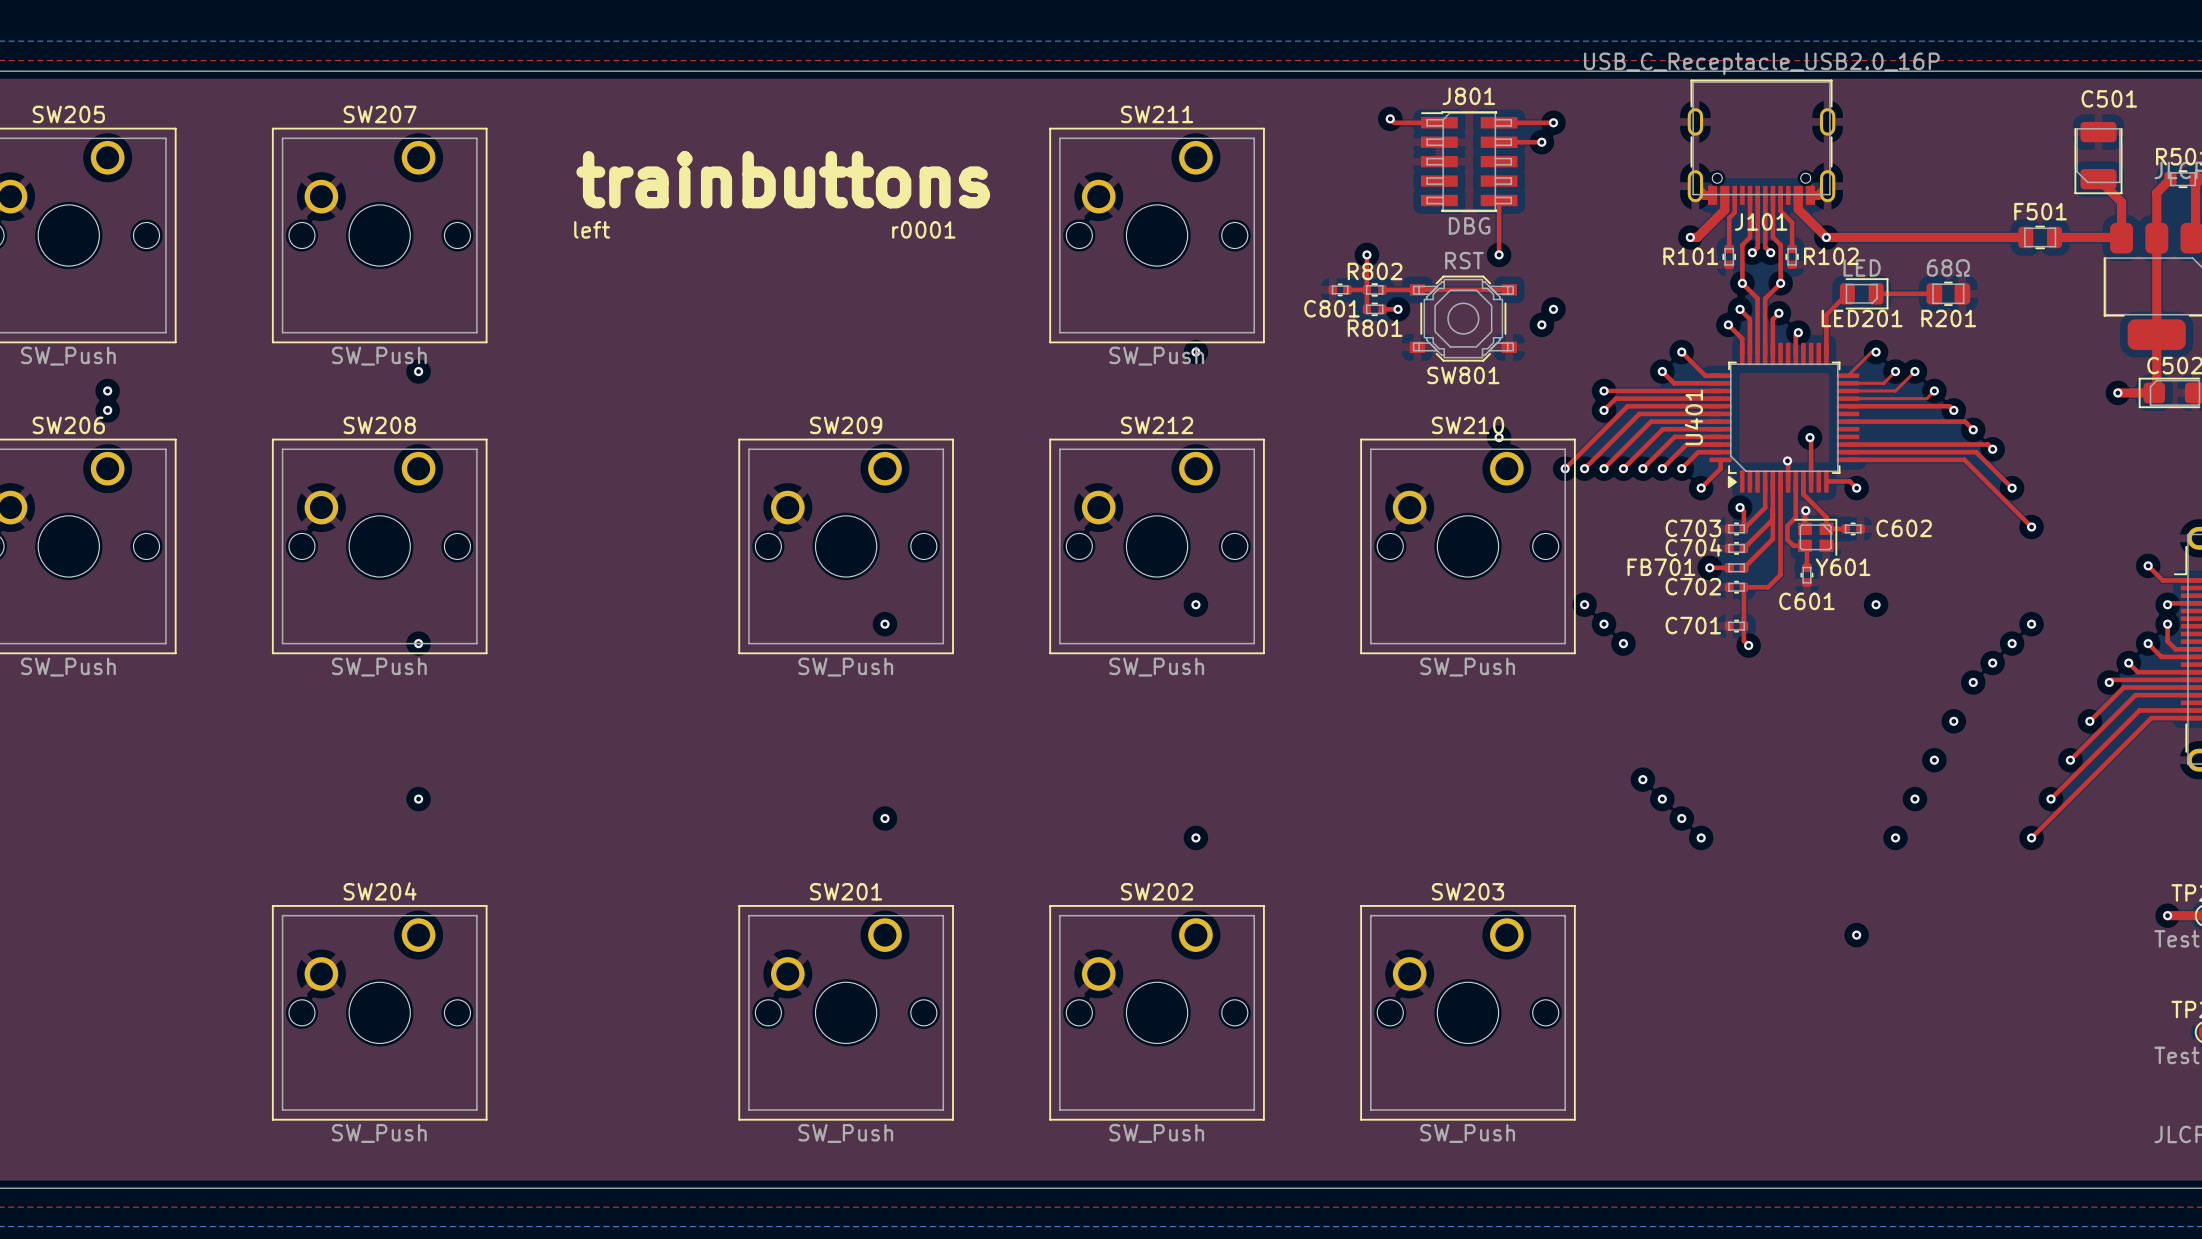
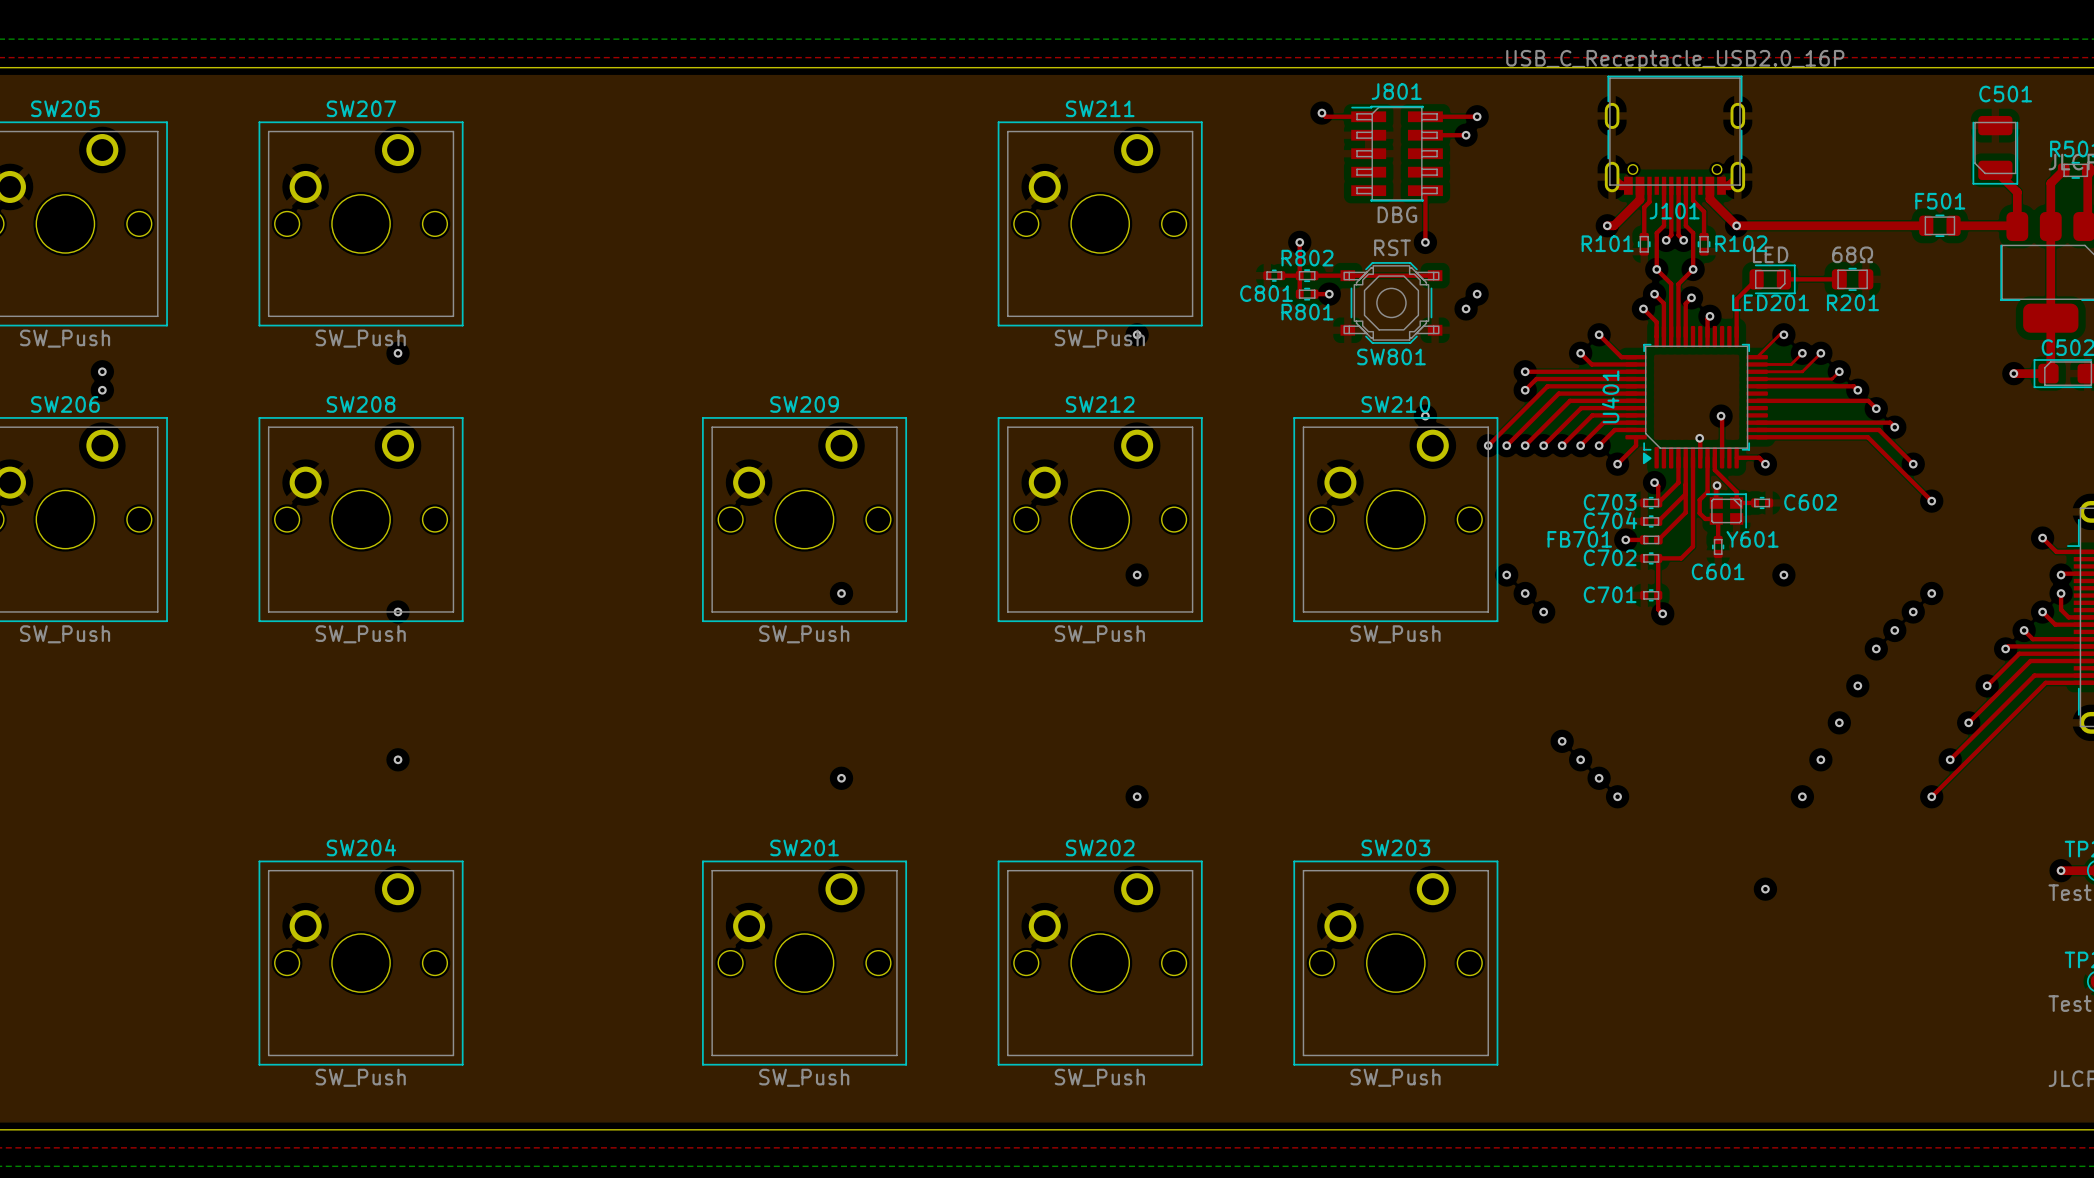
text: trainbuttons (783, 179) -> none
text: left (592, 229) -> none
text: r0001 (923, 229) -> none

